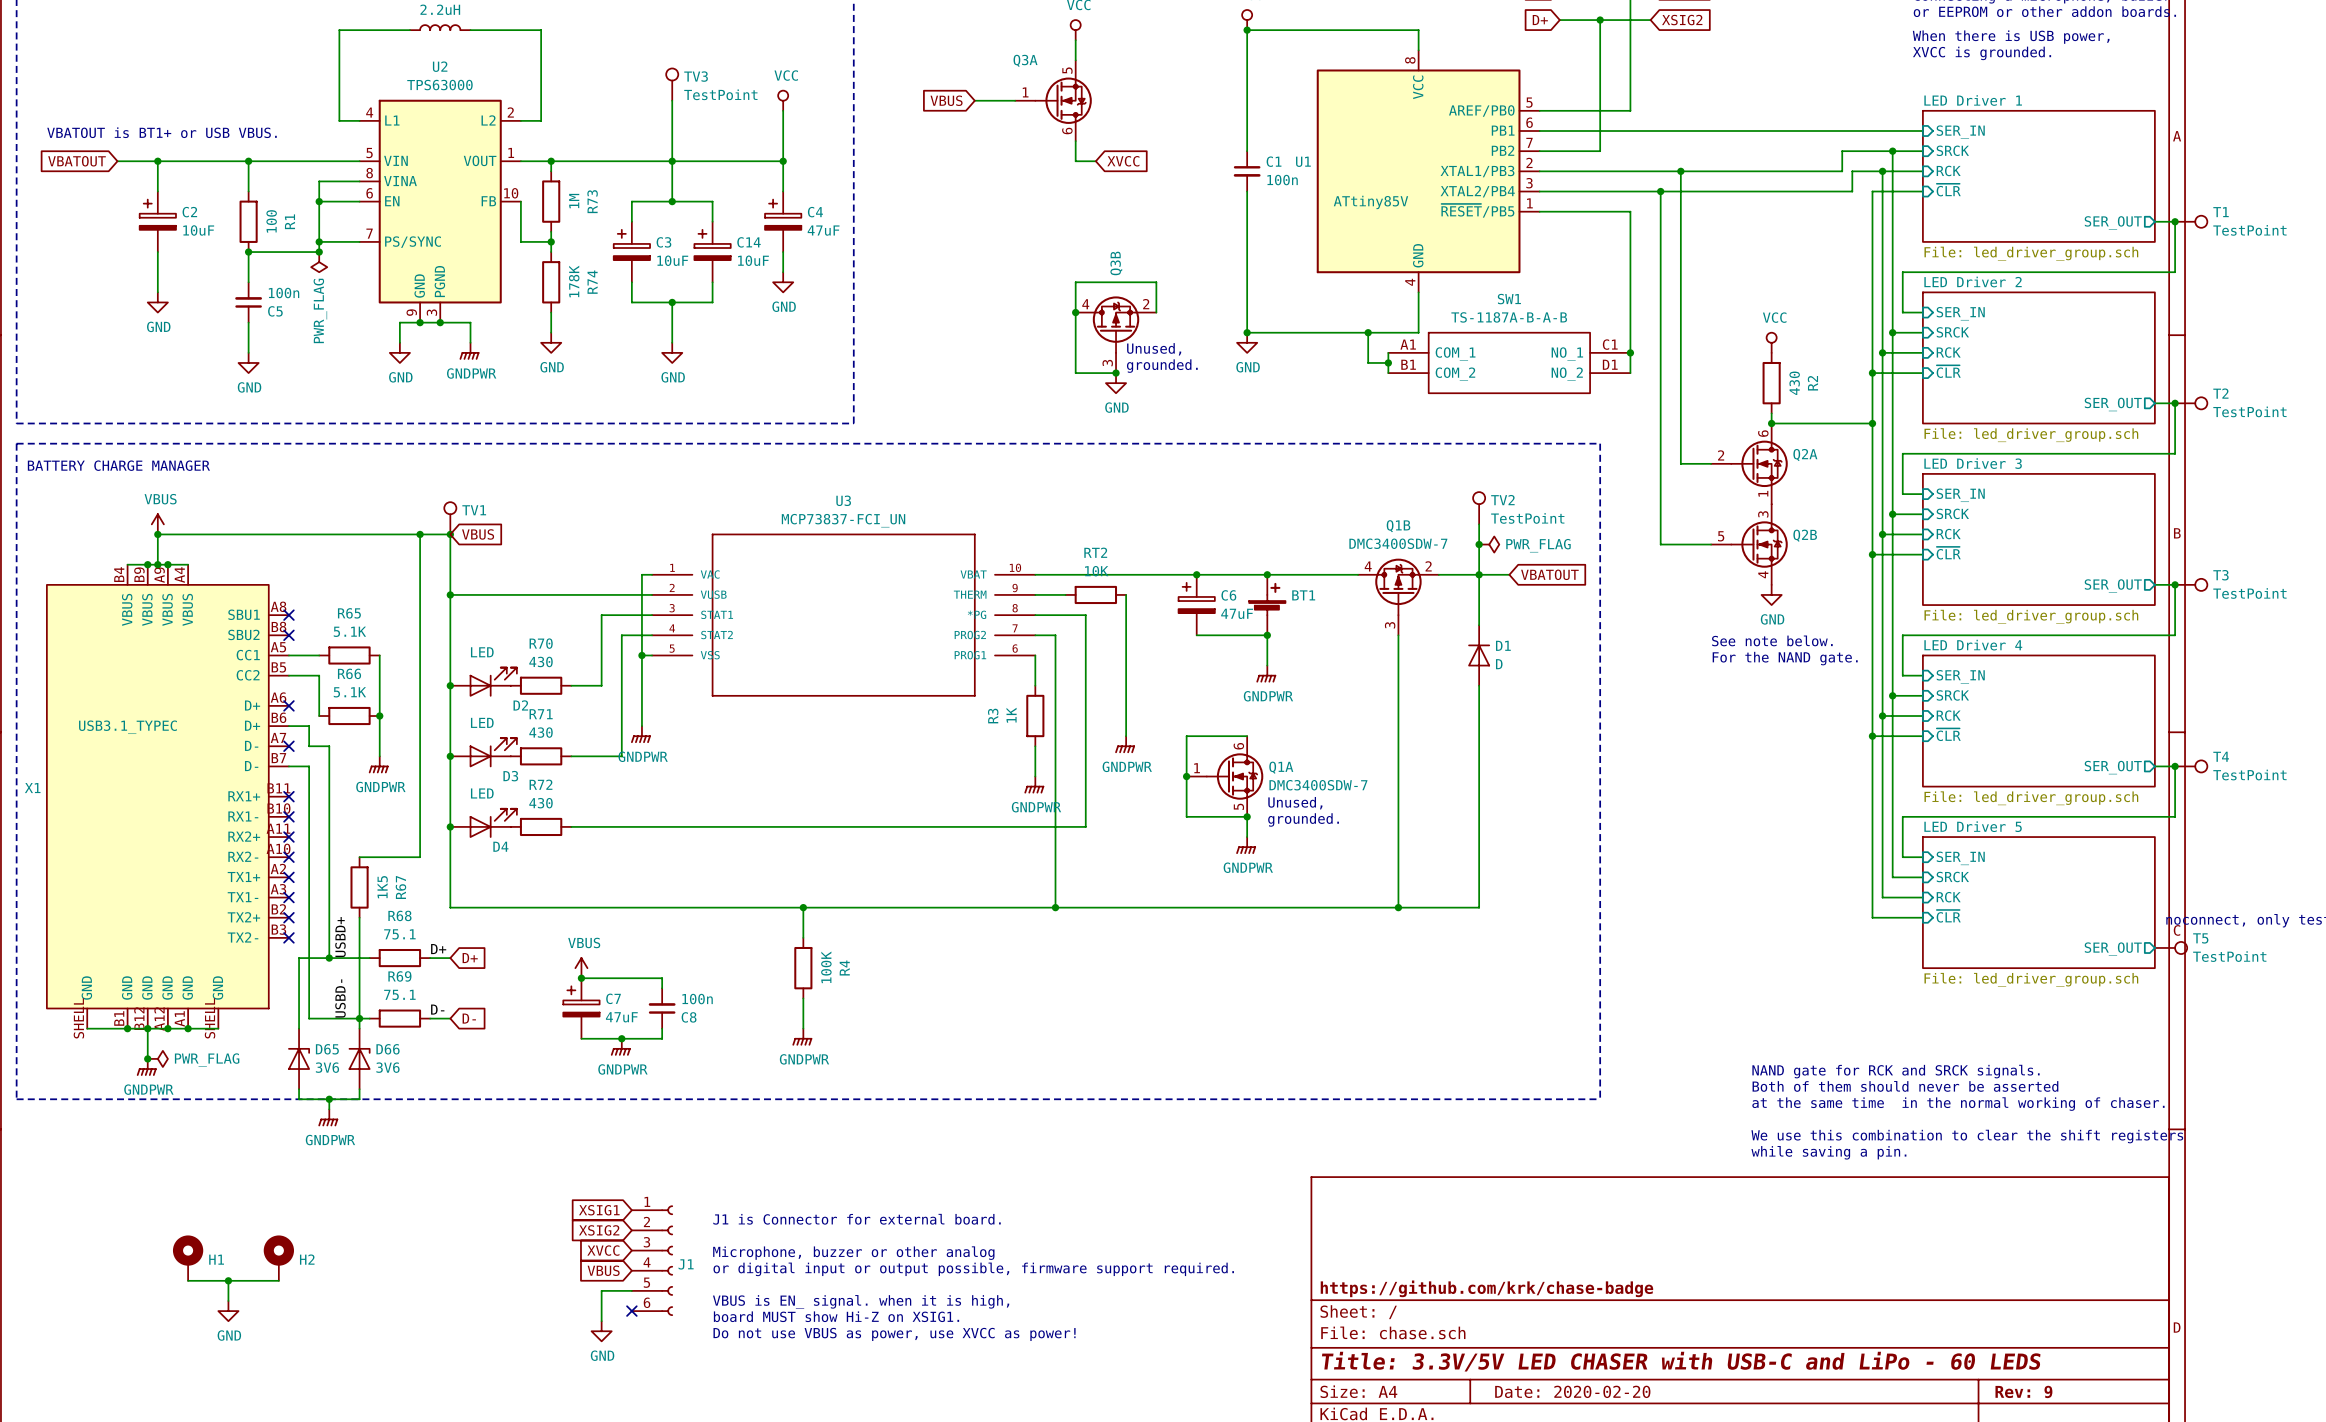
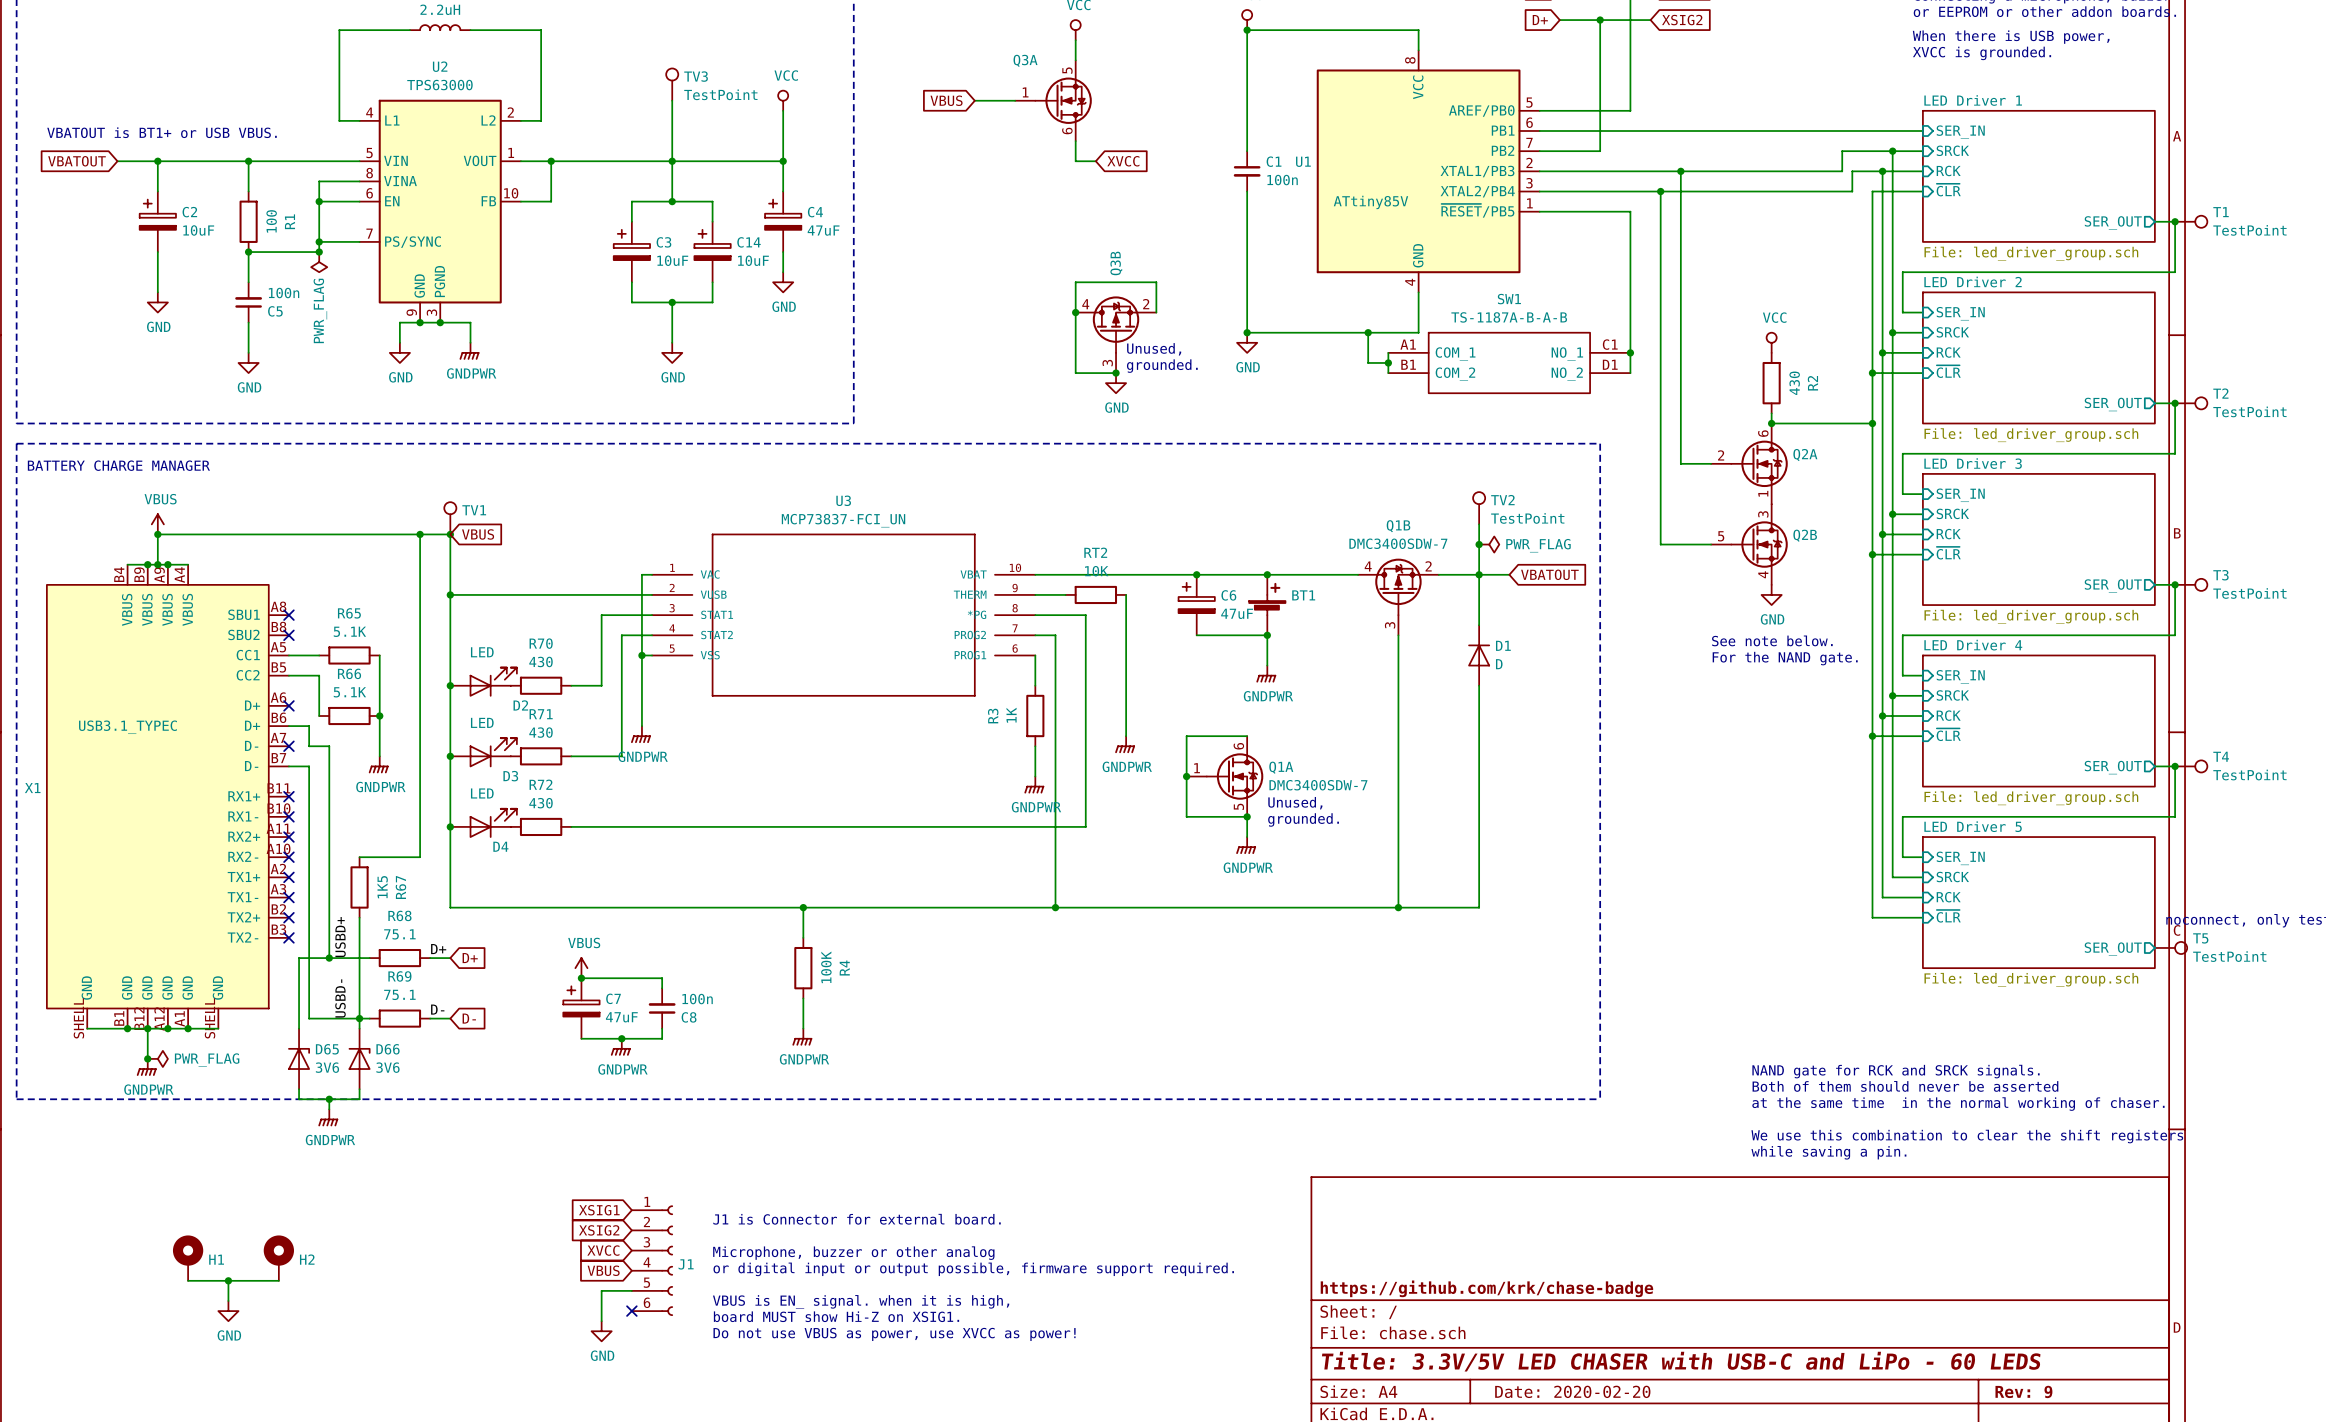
wire: (520, 201) (520, 241) (551, 241) -> (520, 201) (551, 201) (551, 171)
R73: 1M (551, 201) -> none
wire: (551, 231) (551, 252) -> none
junction: (551, 241) -> none
R74: 178K (551, 282) -> none
wire: (551, 312) (551, 332) -> none
power symbol: GND (551, 342) -> none

